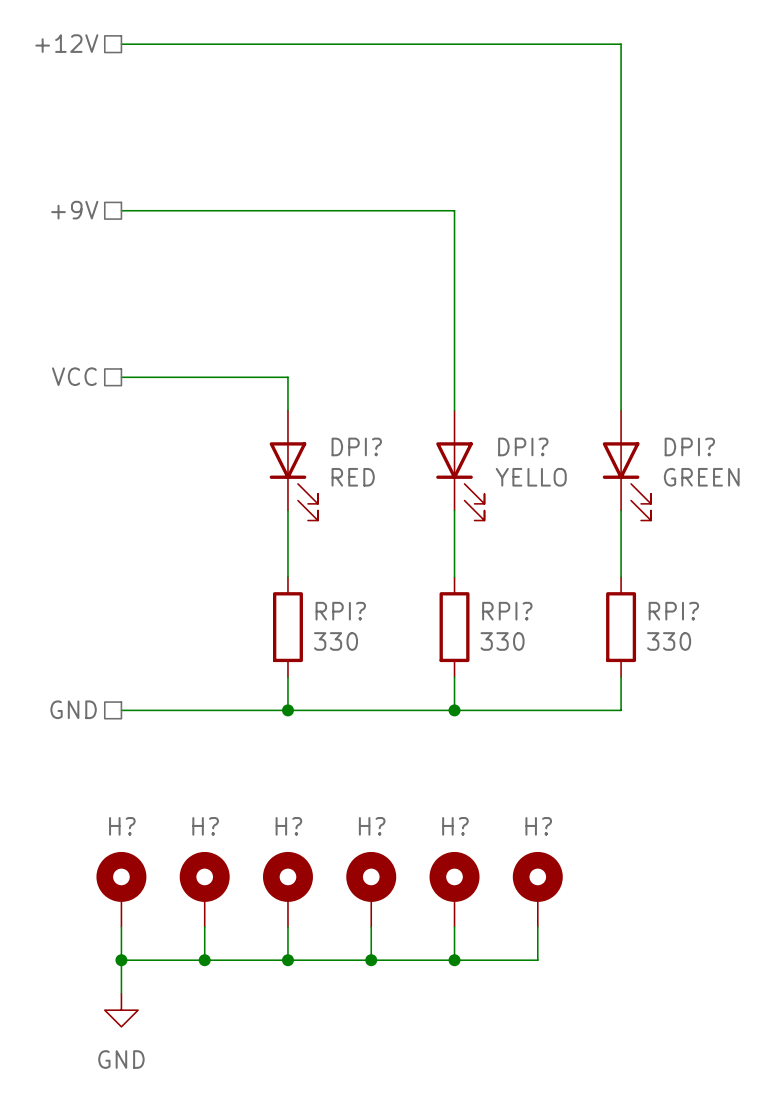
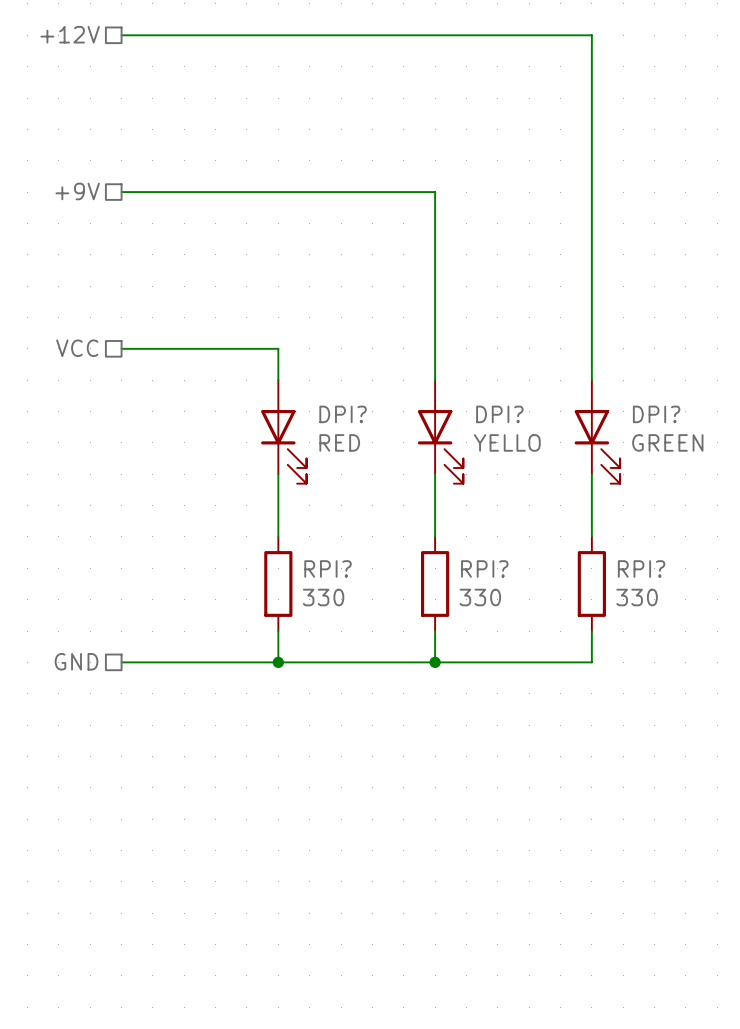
H?: (121, 889) -> none
H?: (204, 889) -> none
H?: (287, 889) -> none
H?: (371, 889) -> none
H?: (454, 889) -> none
H?: (537, 889) -> none
wire: (121, 926) (121, 993) -> none
wire: (204, 926) (204, 960) -> none
wire: (287, 926) (287, 960) -> none
wire: (371, 926) (371, 960) -> none
wire: (454, 926) (454, 960) -> none
wire: (537, 926) (537, 960) (121, 960) -> none
junction: (121, 960) -> none
junction: (204, 960) -> none
junction: (287, 960) -> none
junction: (371, 960) -> none
junction: (454, 960) -> none
power symbol: GND (121, 1010) -> none

